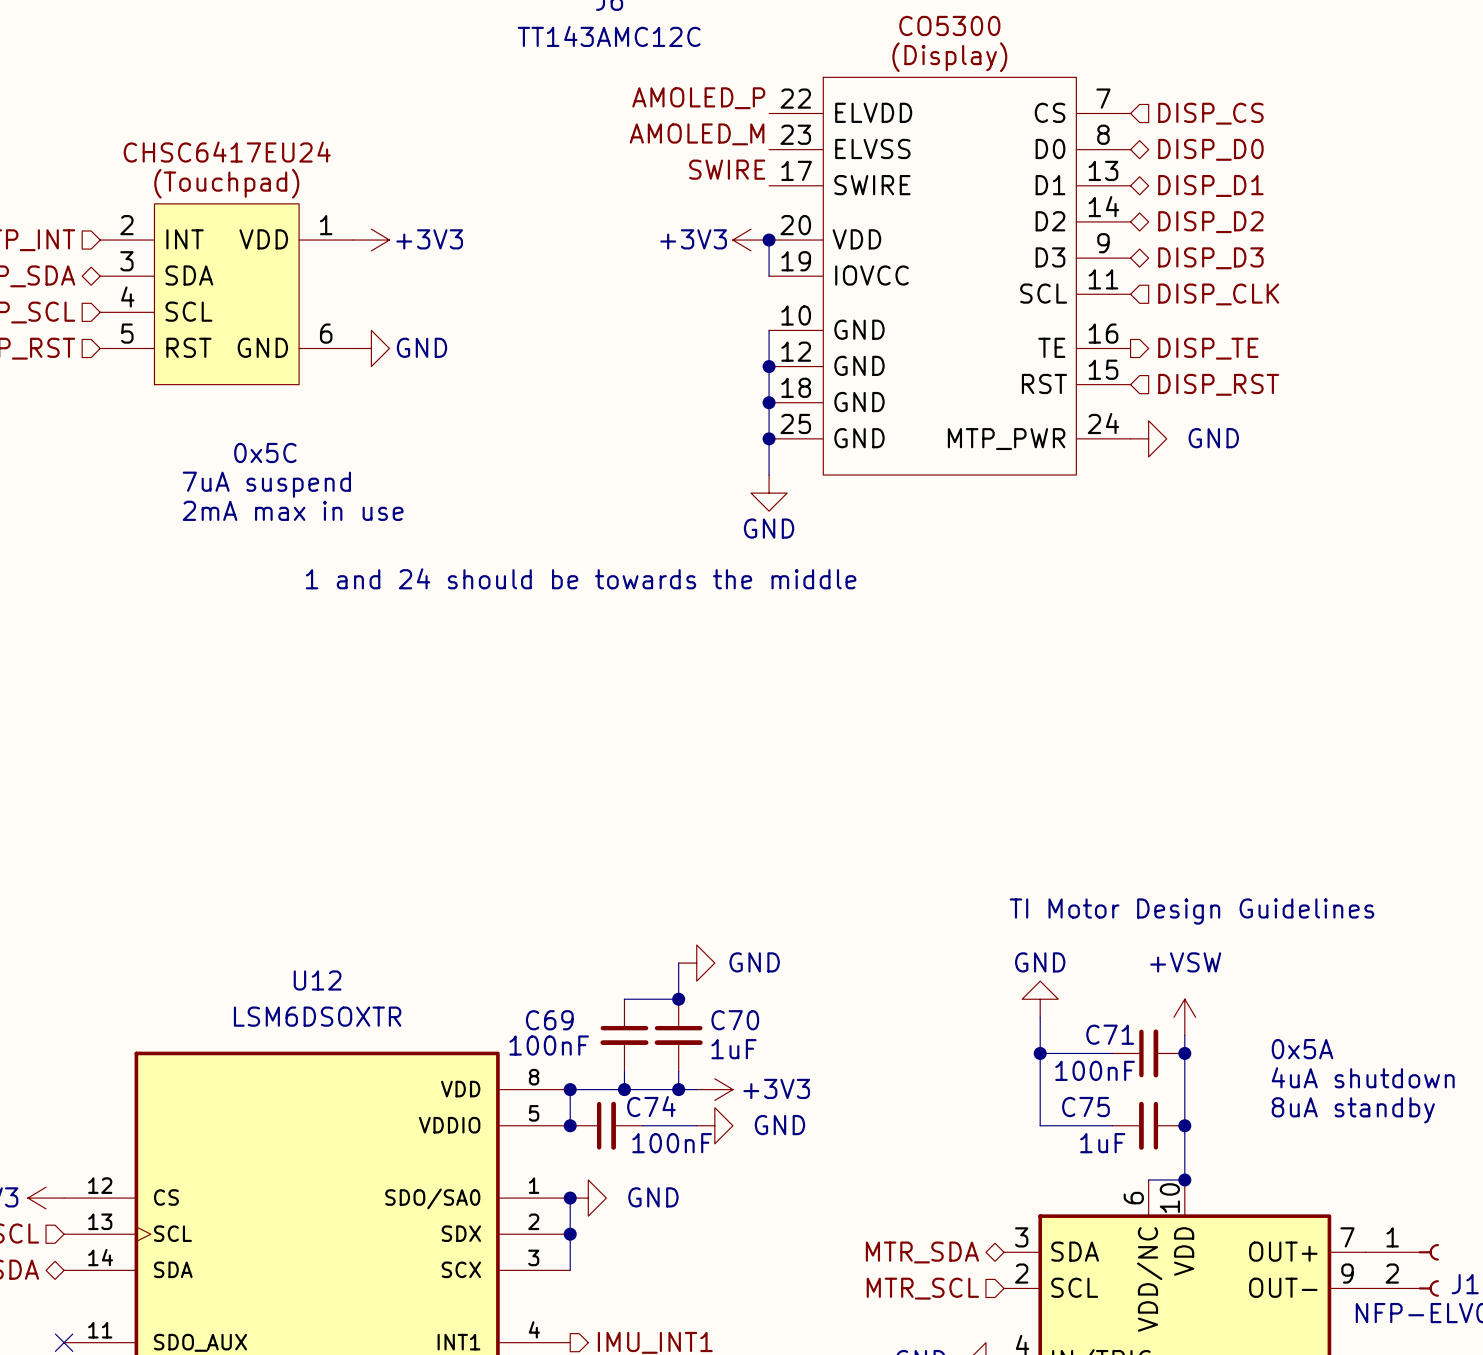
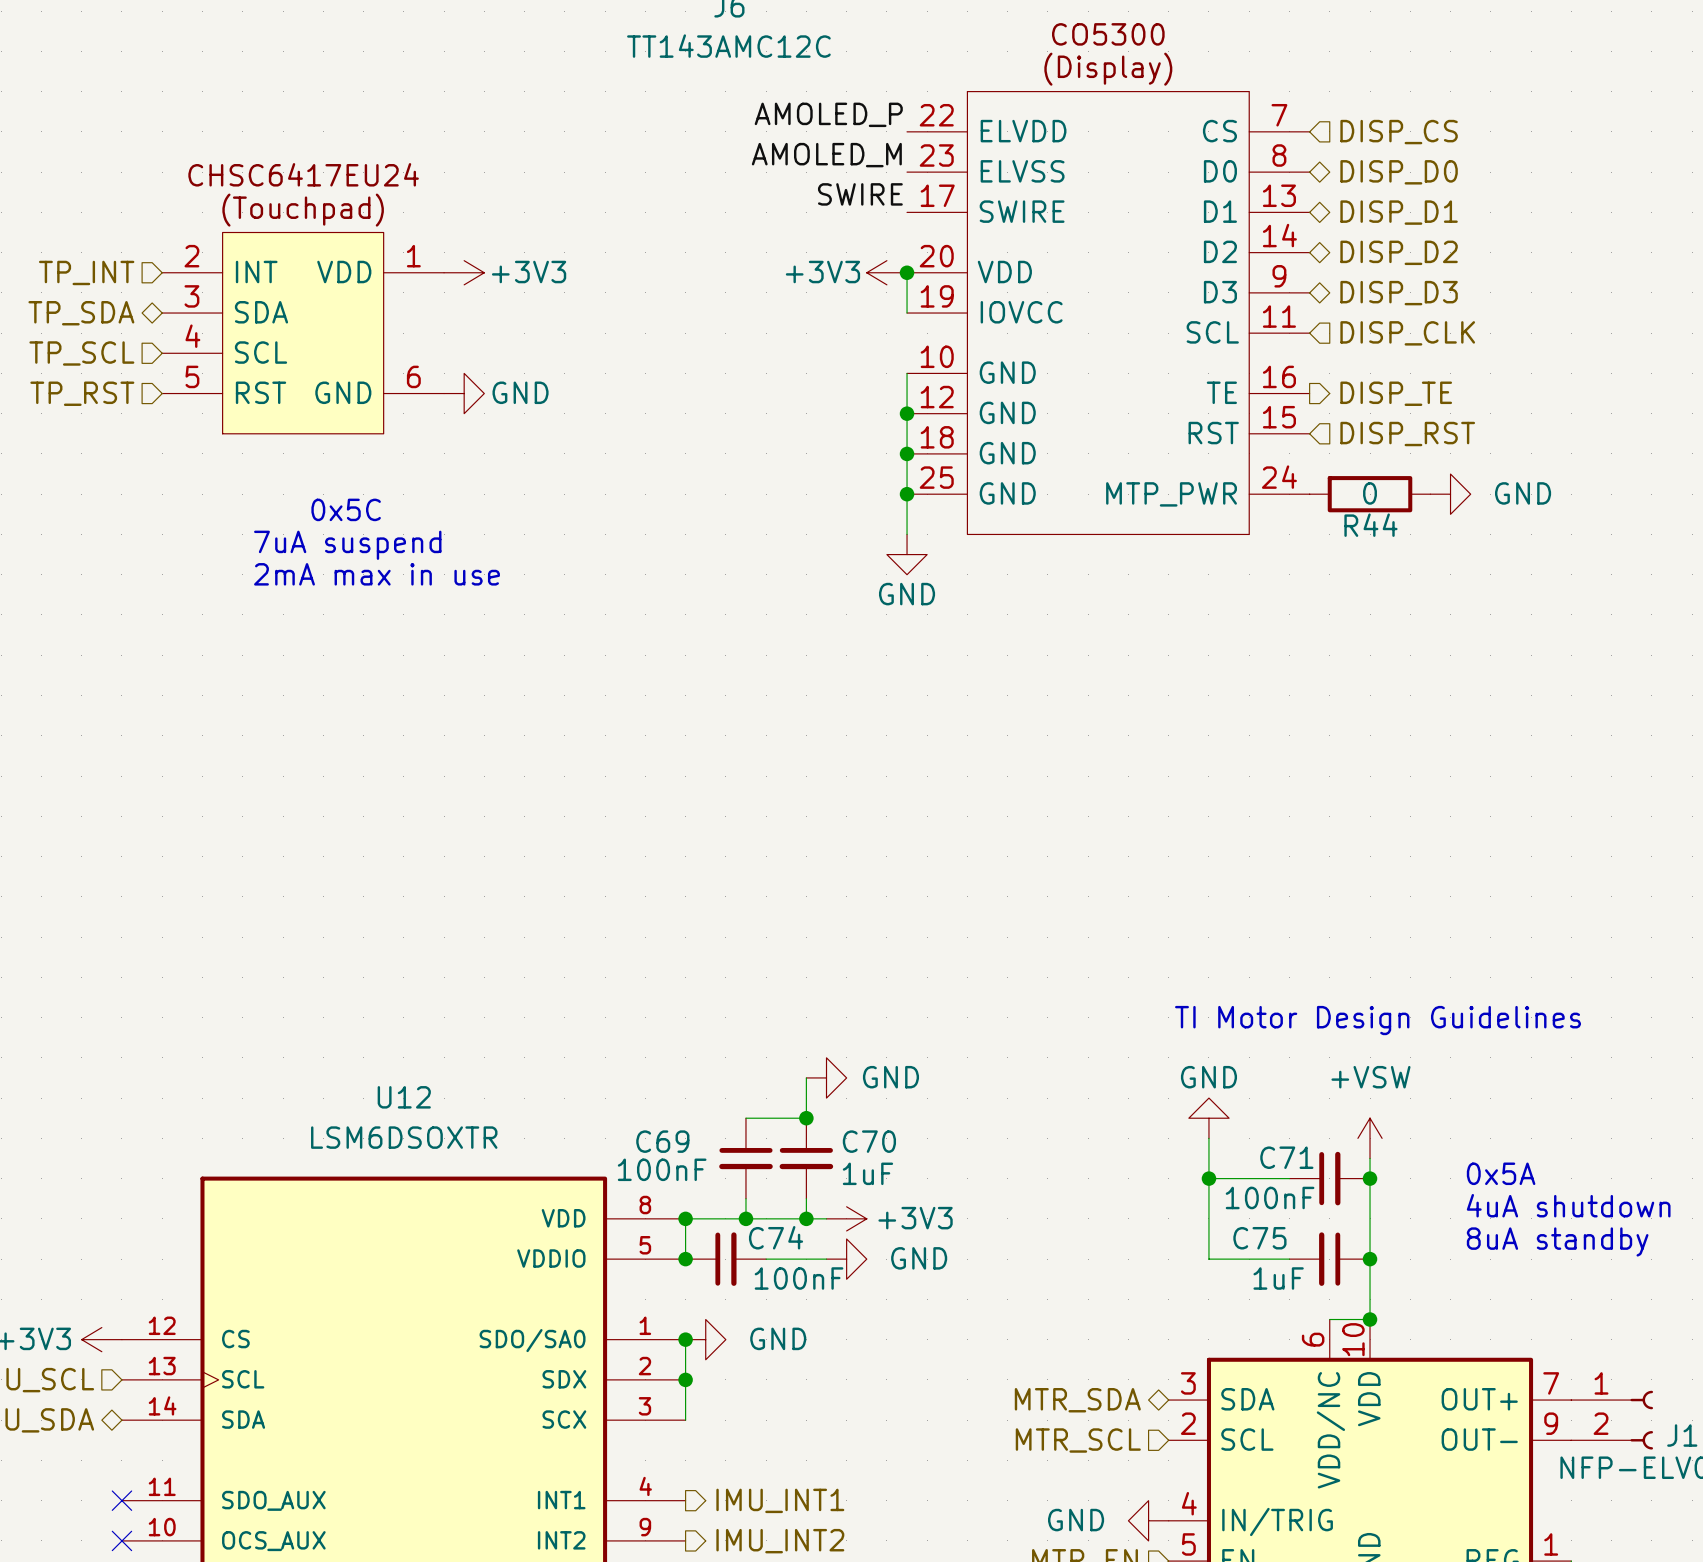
power symbol position: GND (1148, 438) -> GND (1450, 494)
R44: none -> 0 (1370, 494)
text: 1 and 24 should be towards the middle (581, 578) -> none

